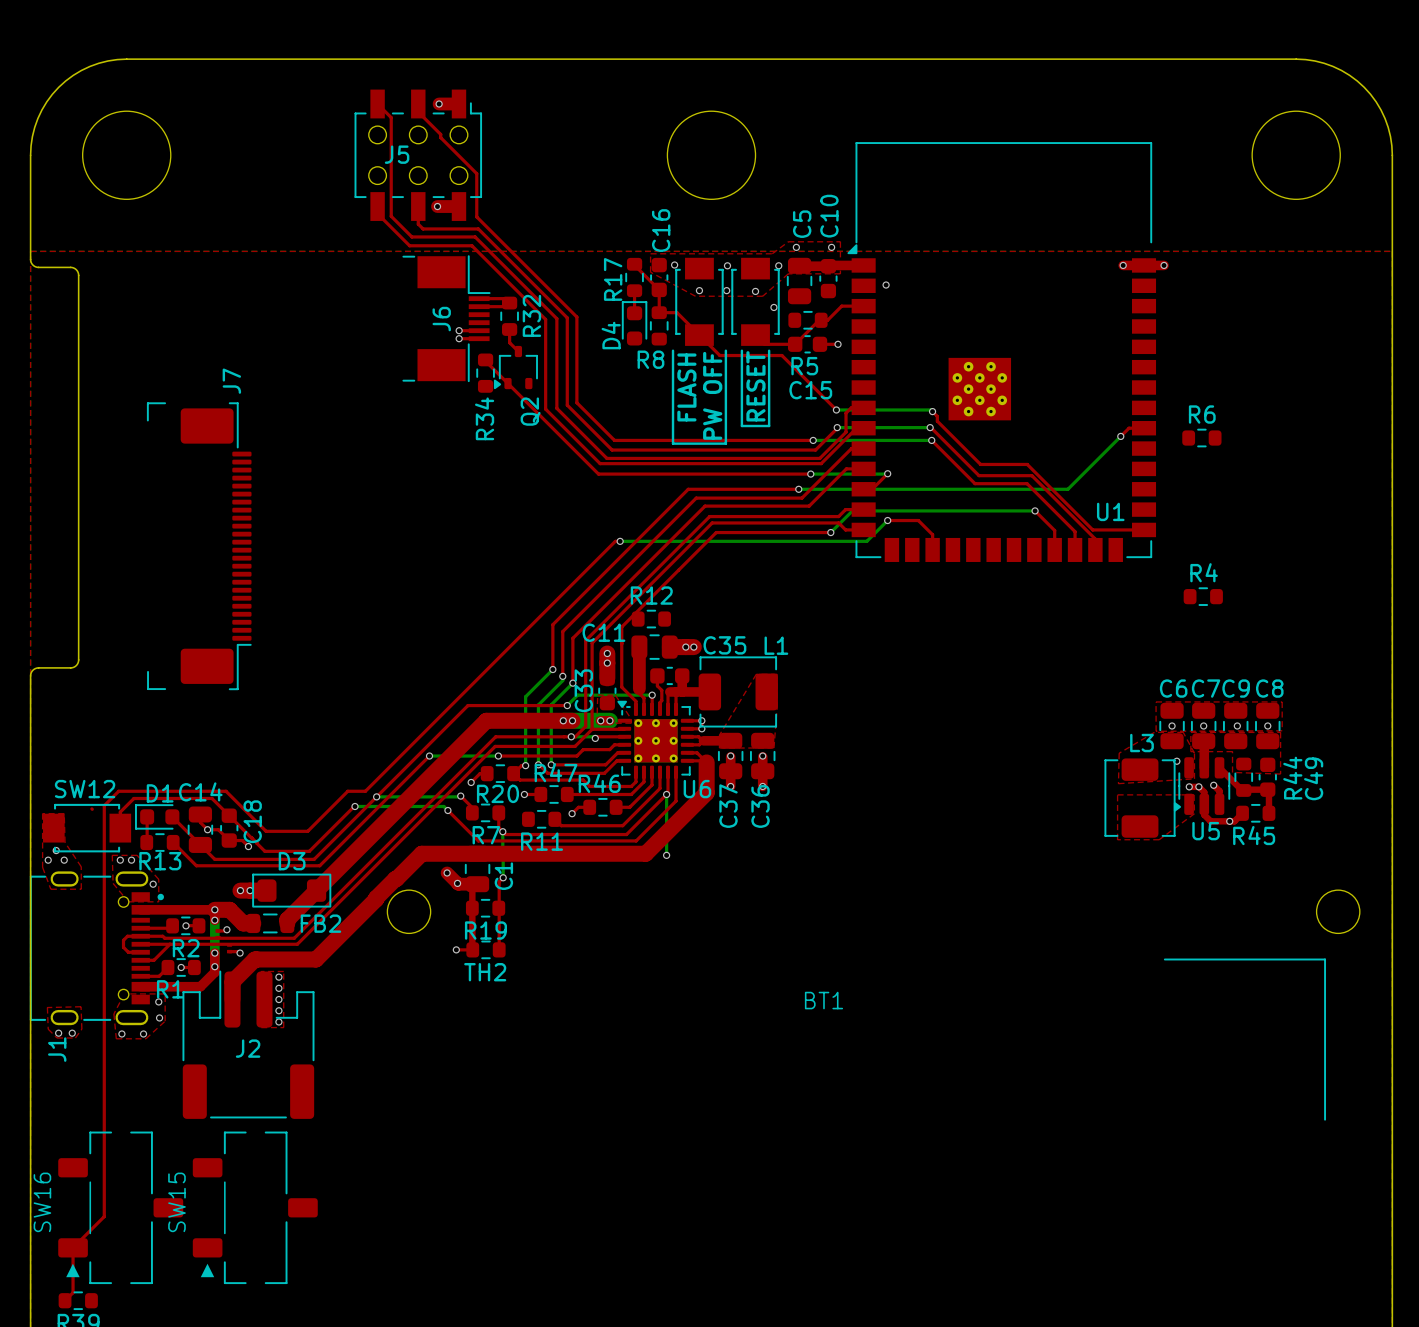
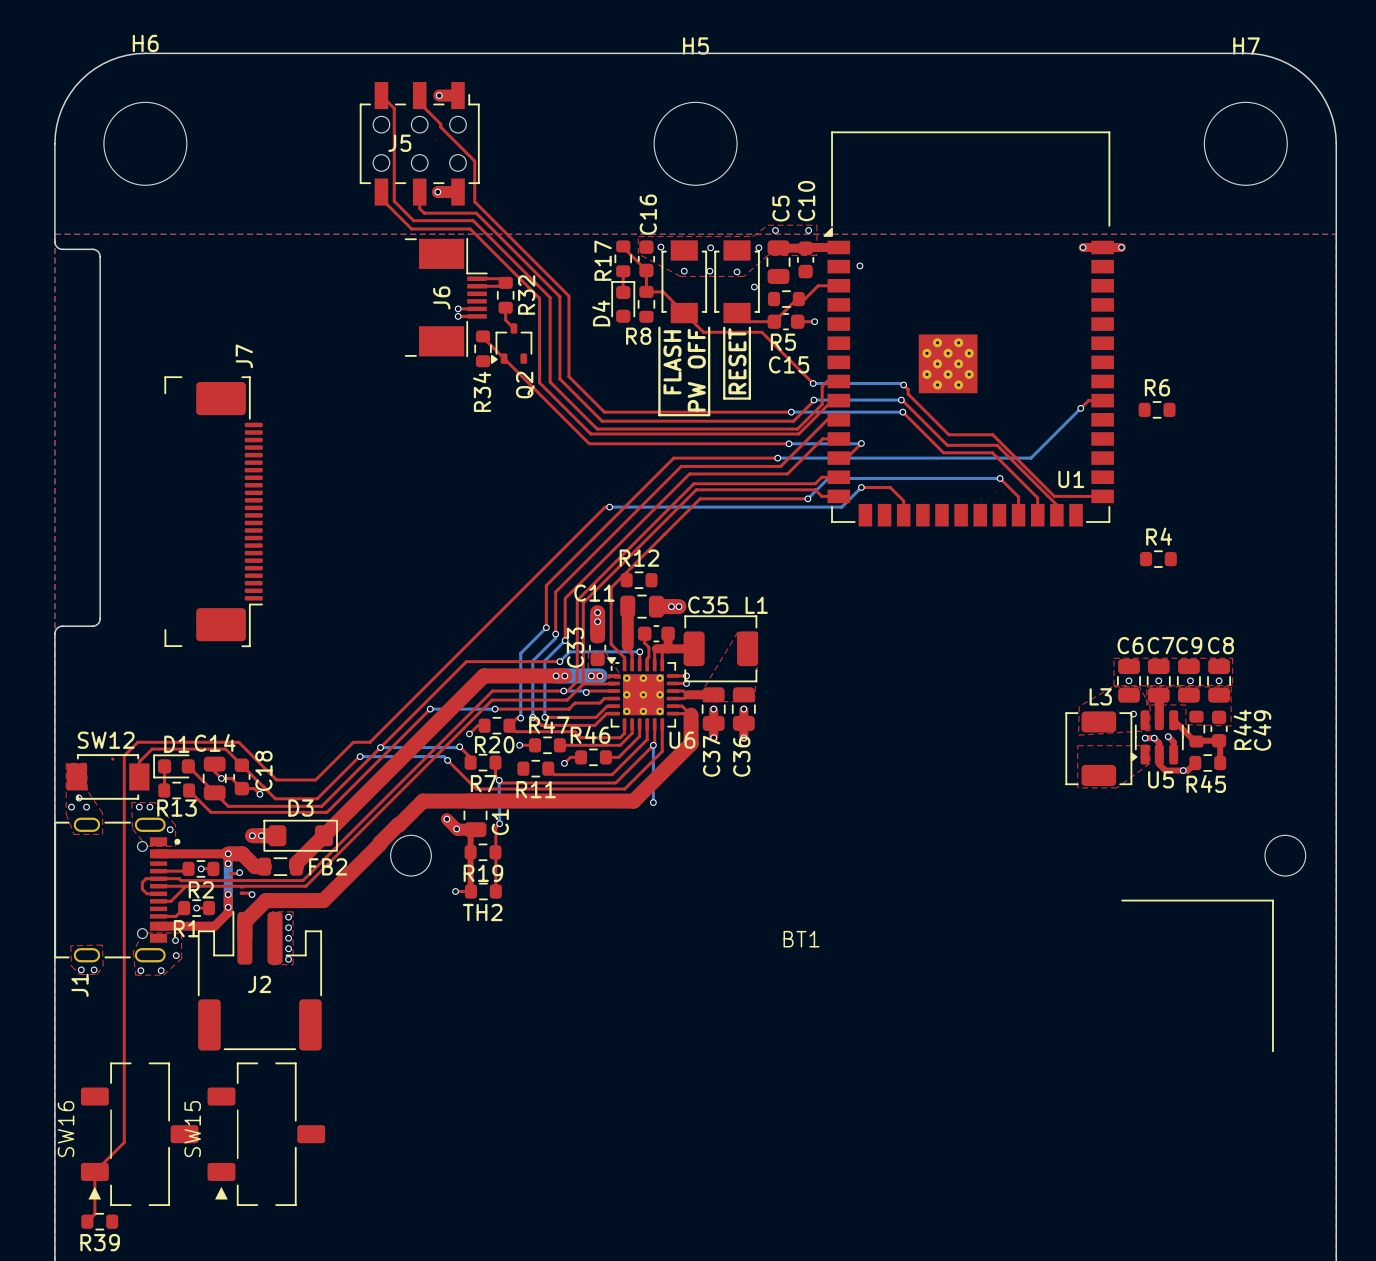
H6 name: none -> H6 (145, 43)
H5 name: none -> H5 (695, 46)
H7 name: none -> H7 (1246, 46)

